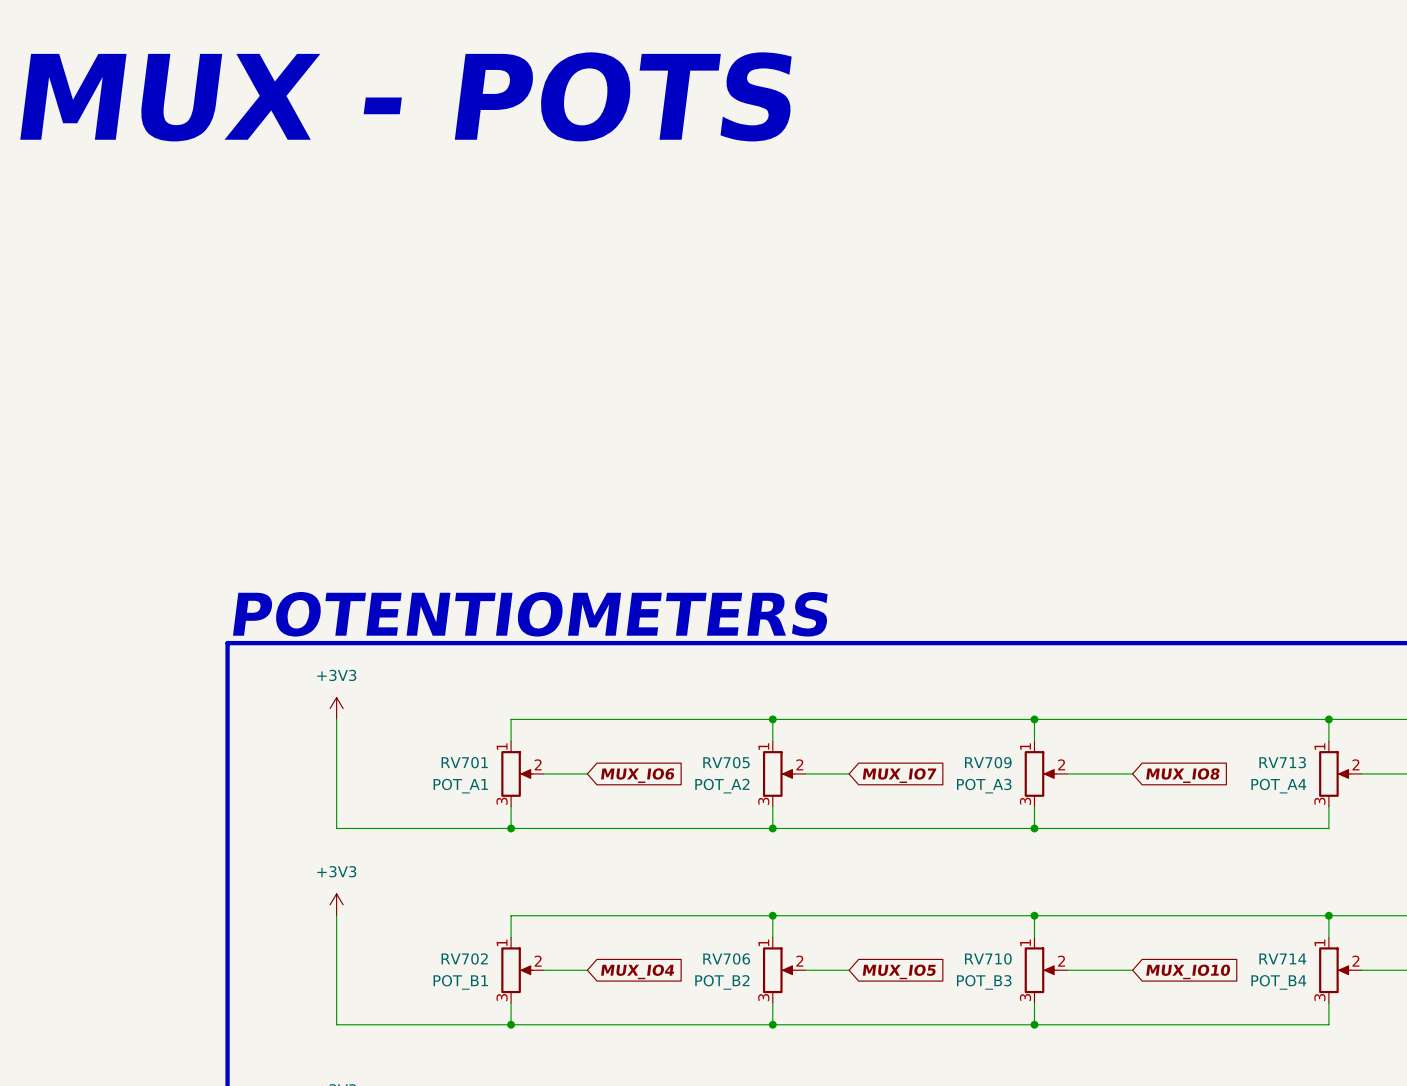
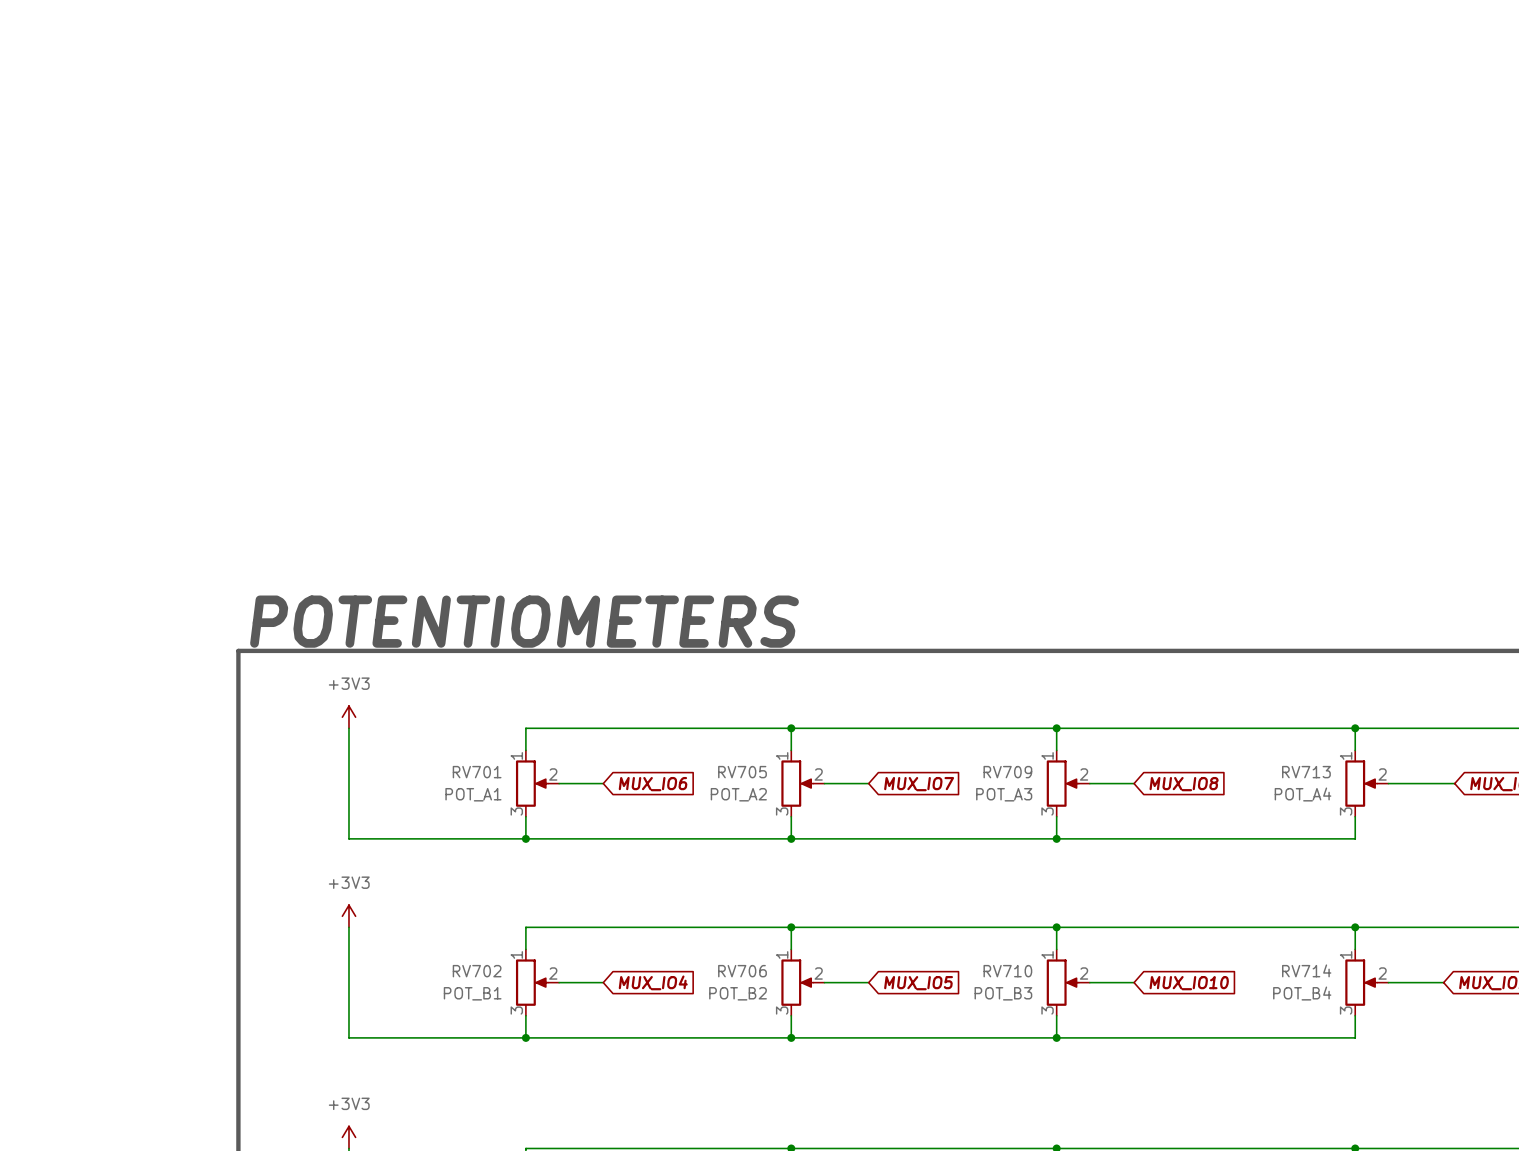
text: MUX - POTS (405, 96) -> none
wire: (1110, 773) (1132, 773) -> none
global label position: MUX_IO8 (1182, 775) -> MUX_IO8 (1184, 784)
wire: (1110, 970) (1132, 970) -> none
global label position: MUX_IO10 (1188, 971) -> MUX_IO10 (1189, 983)

